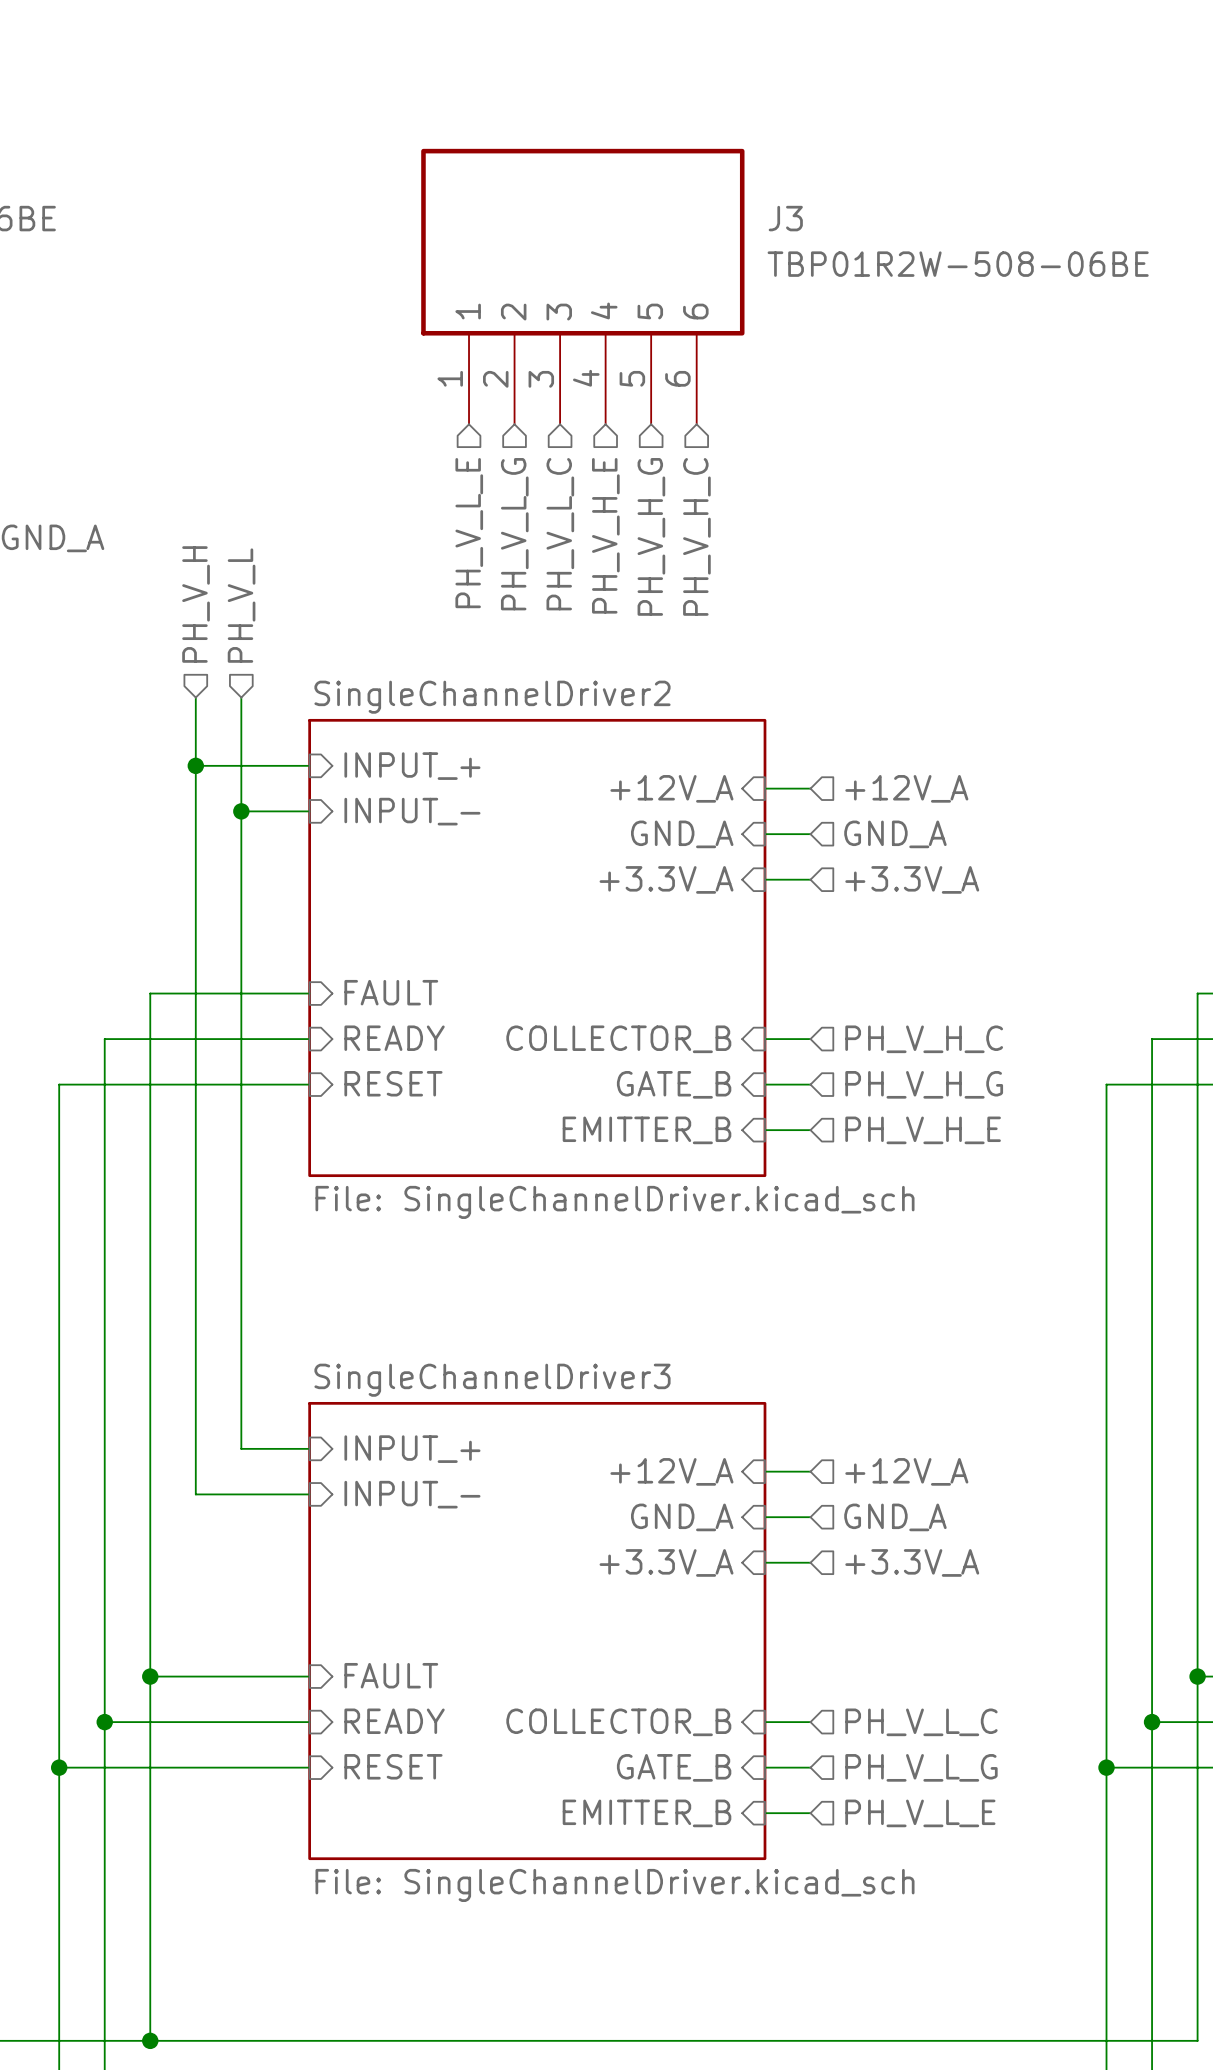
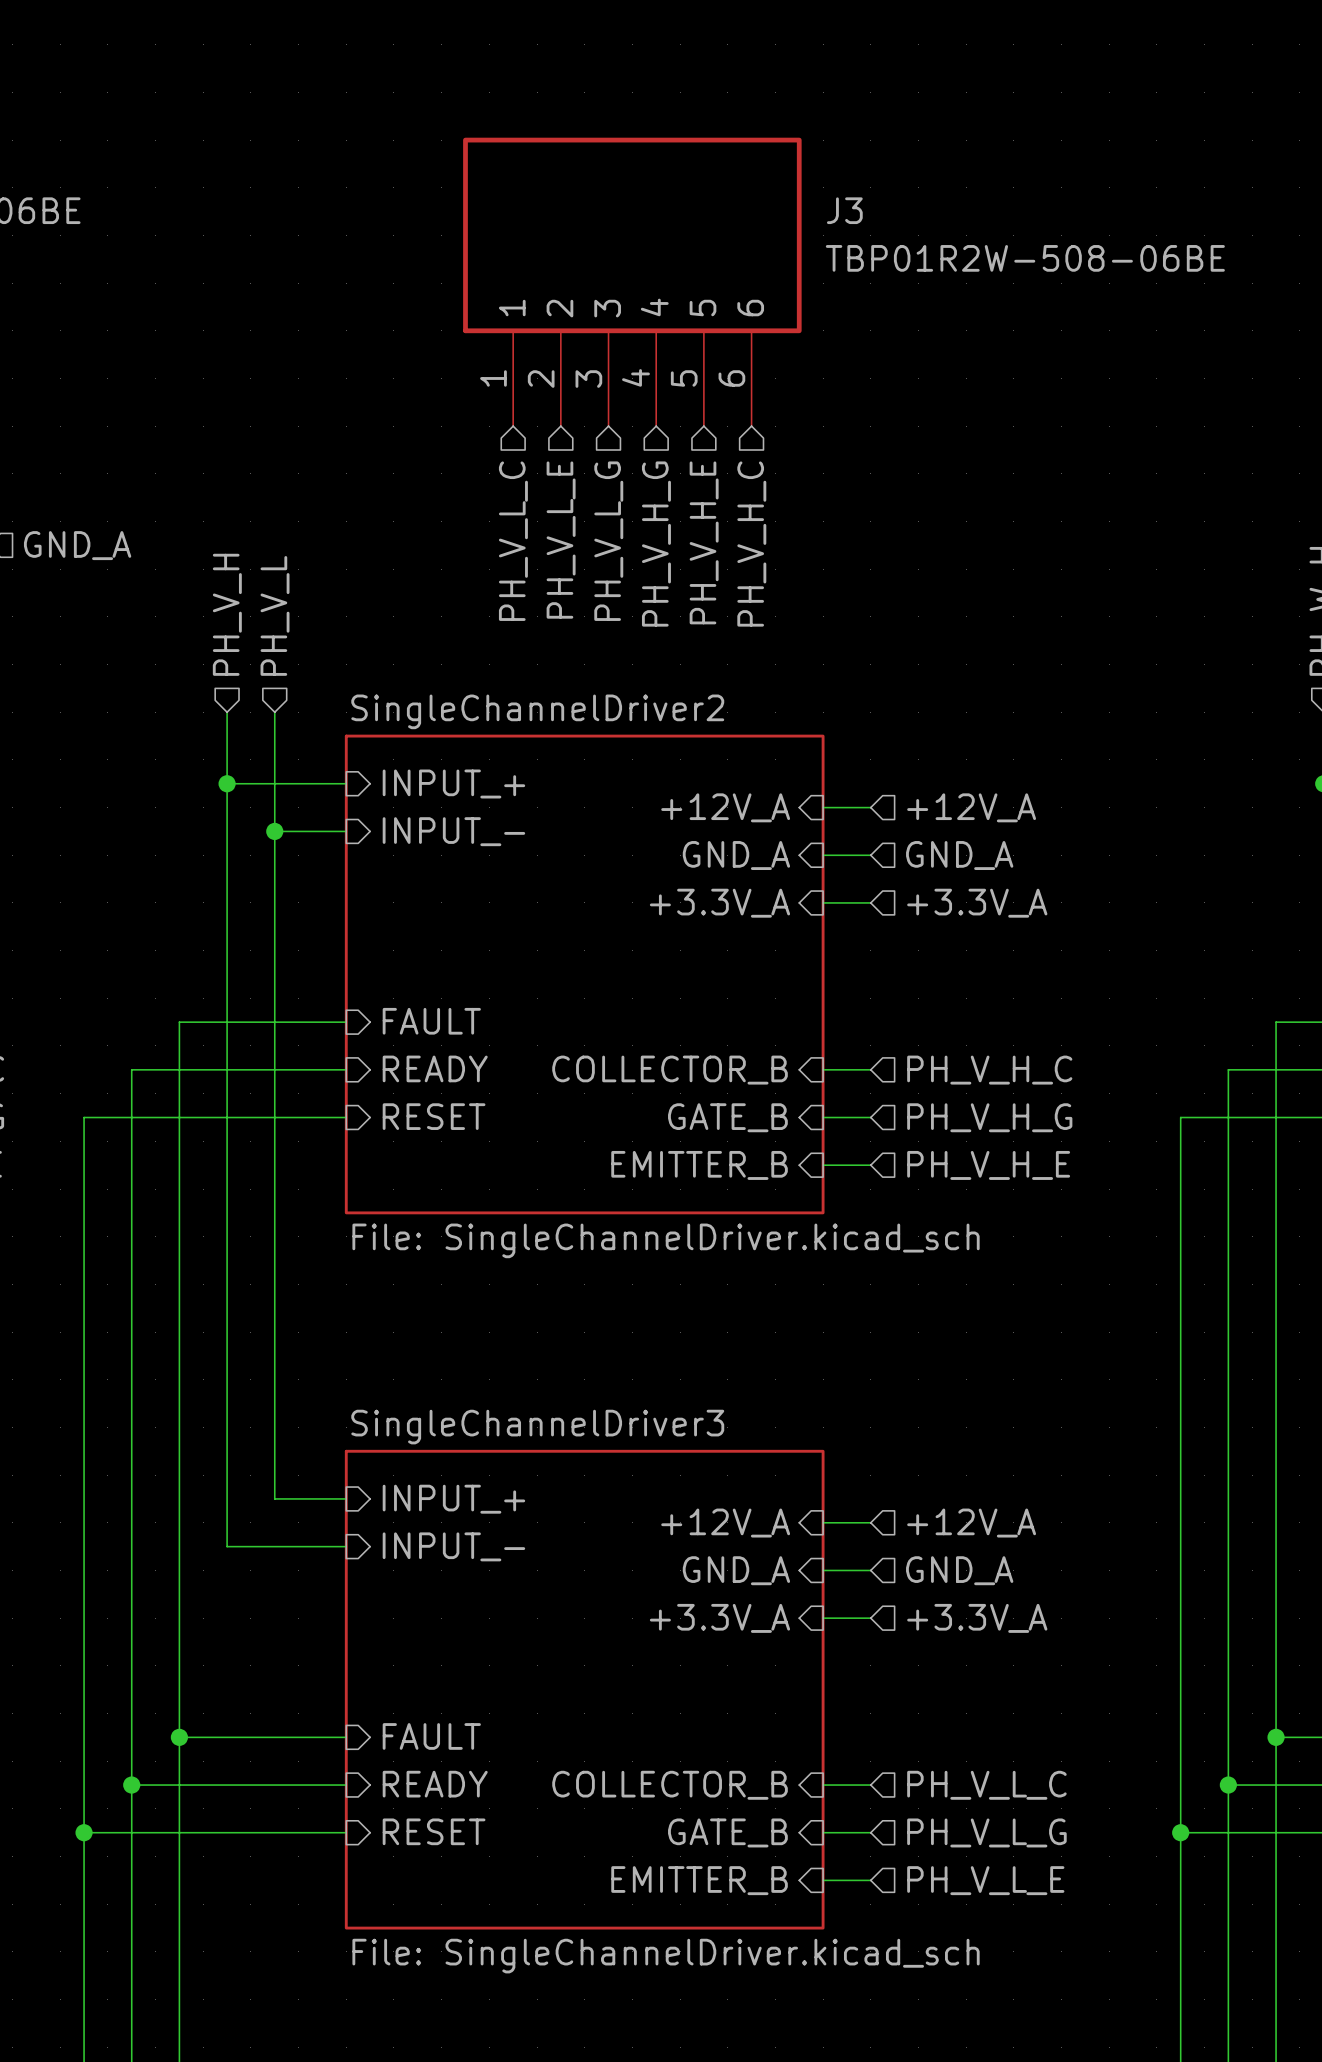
hierarchical label: PH_V_L_E (469, 533) -> PH_V_L_C (513, 541)
hierarchical label: PH_V_L_G (514, 534) -> PH_V_L_E (561, 540)
hierarchical label: PH_V_L_C (560, 534) -> PH_V_L_G (608, 541)
hierarchical label: PH_V_H_E (605, 535) -> PH_V_H_G (656, 544)
hierarchical label: PH_V_H_G (651, 536) -> PH_V_H_E (704, 542)

